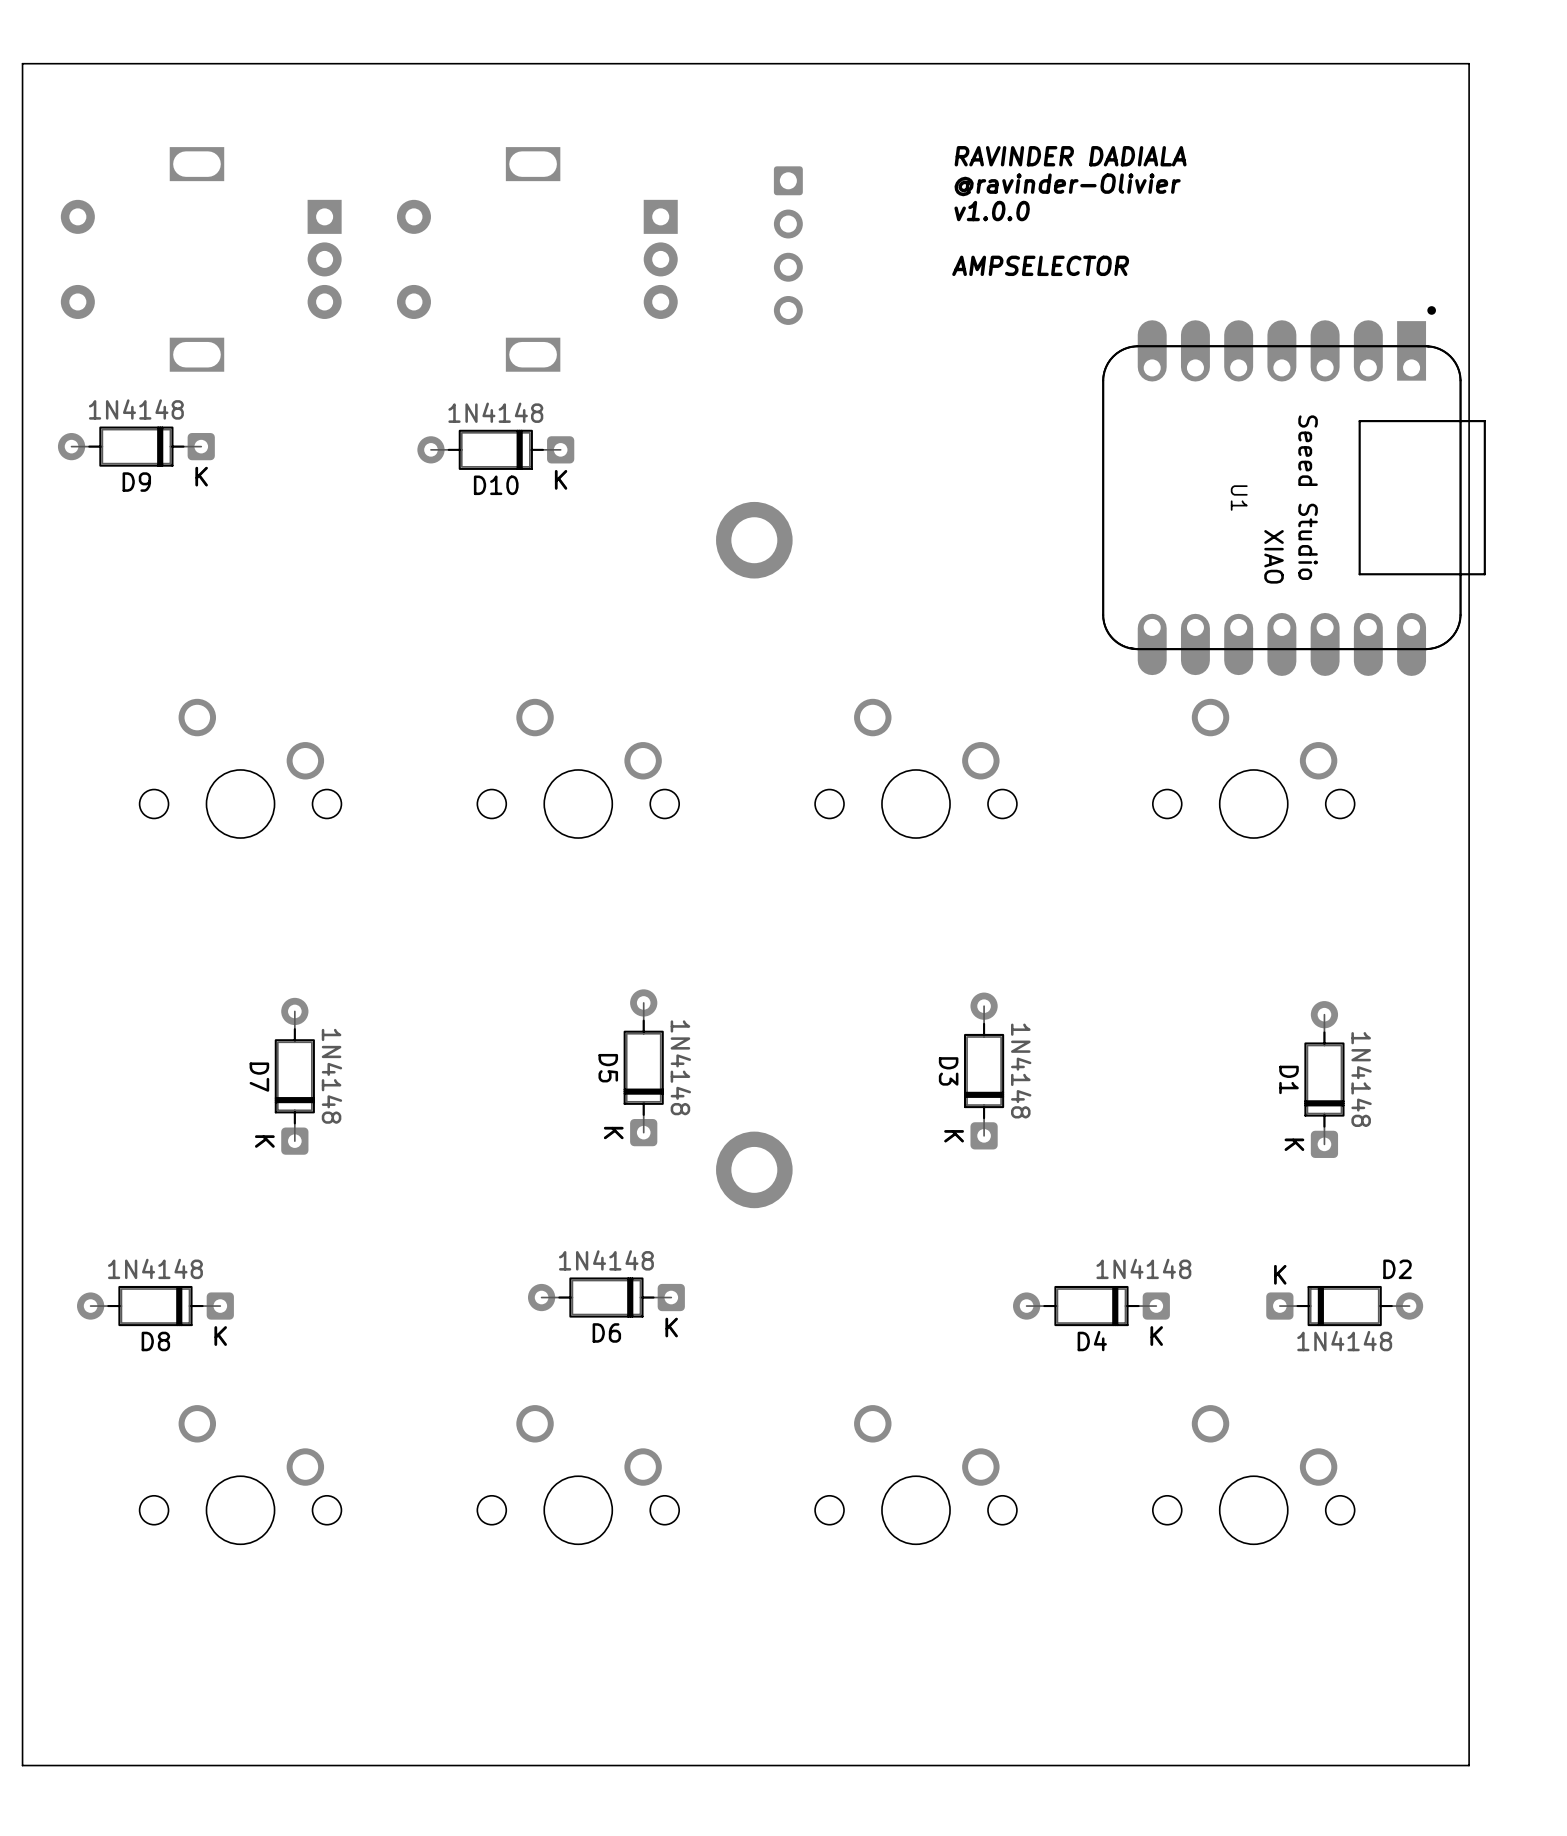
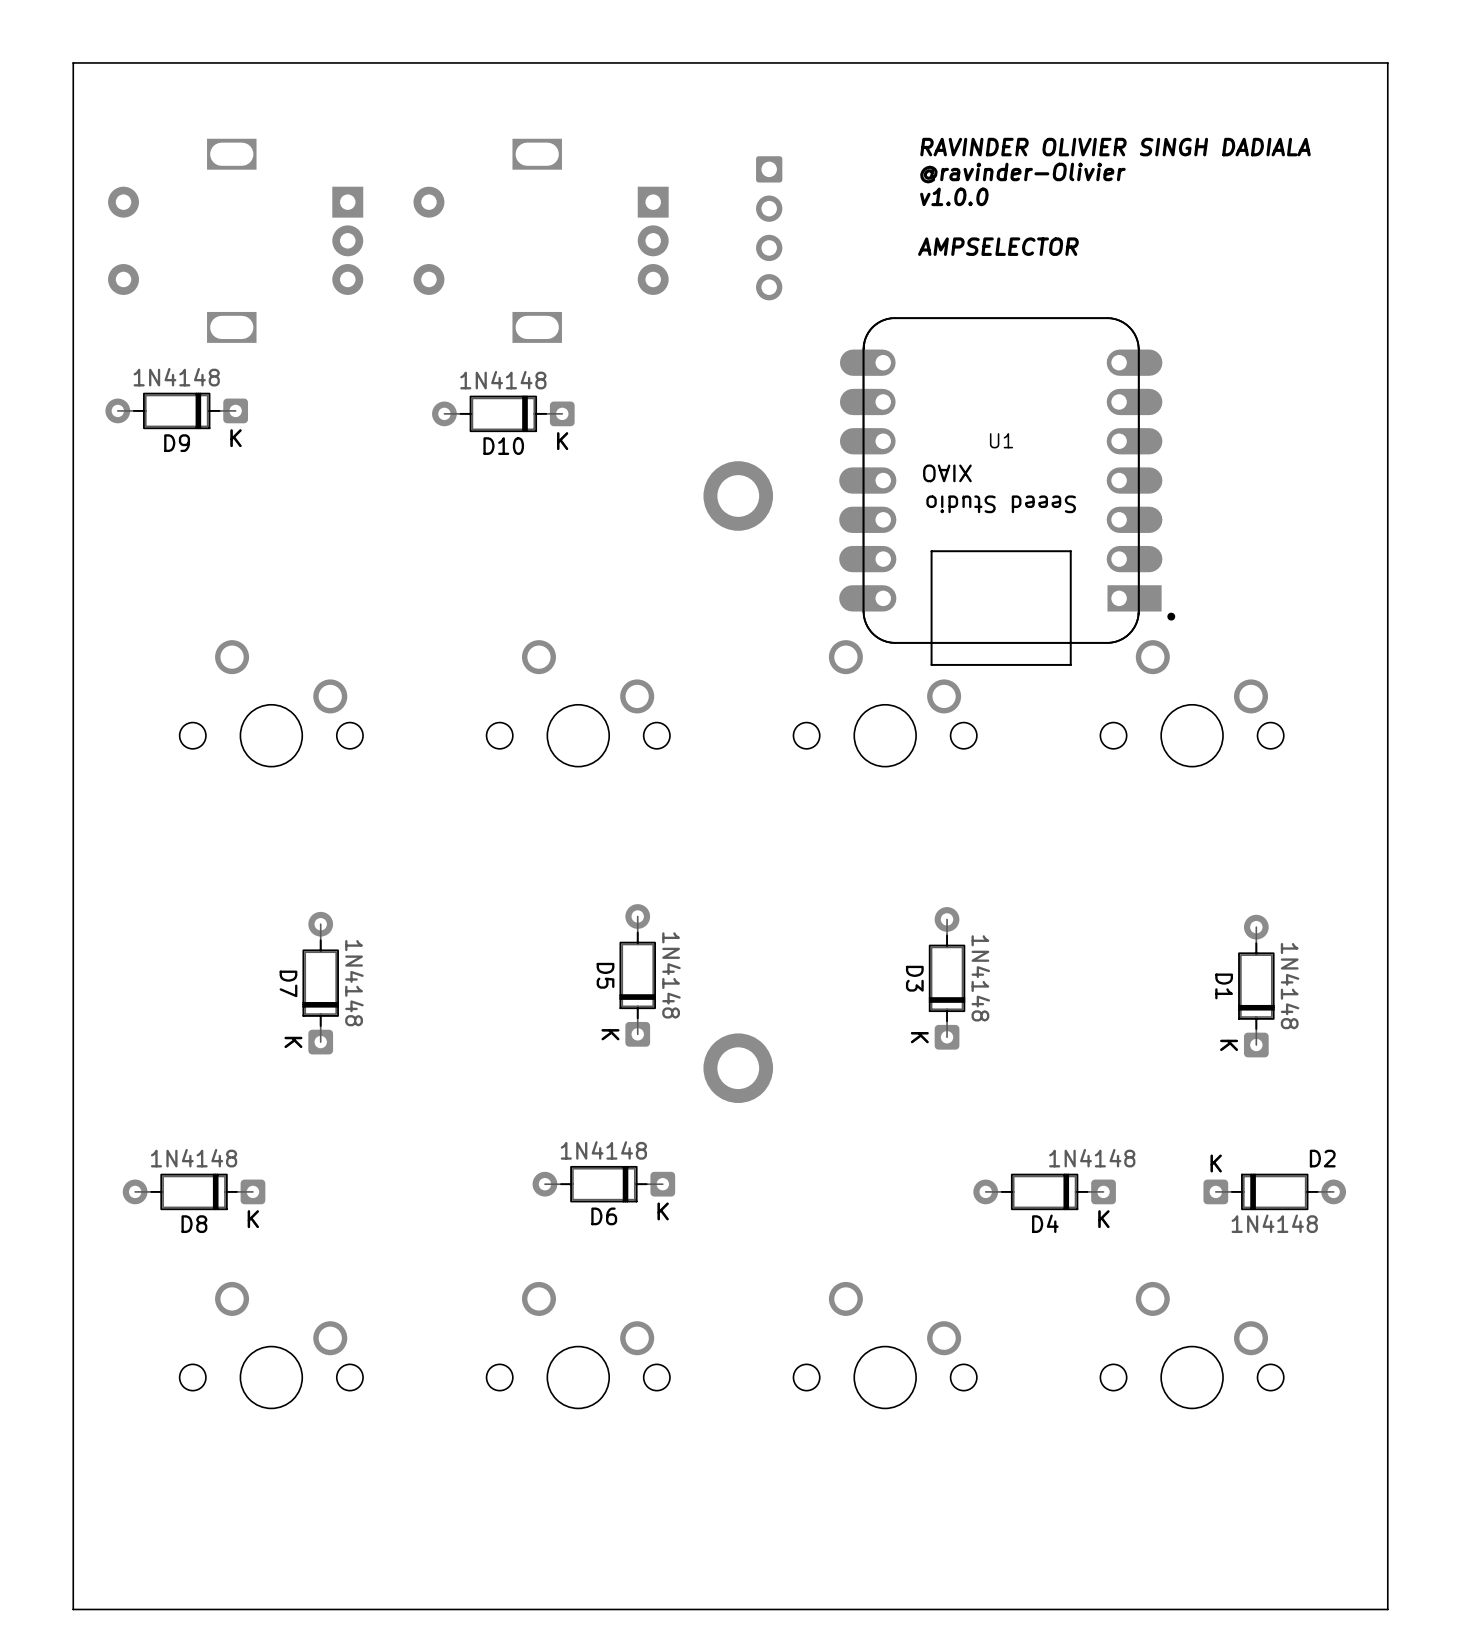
text: RAVINDER DADIALA (1070, 156) -> RAVINDER OLIVIER SINGH DADIALA (1115, 147)
U1 rotation: 0° (1294, 491) -> 90° clockwise (1007, 491)
U1 position: (1294, 491) -> (1007, 491)

